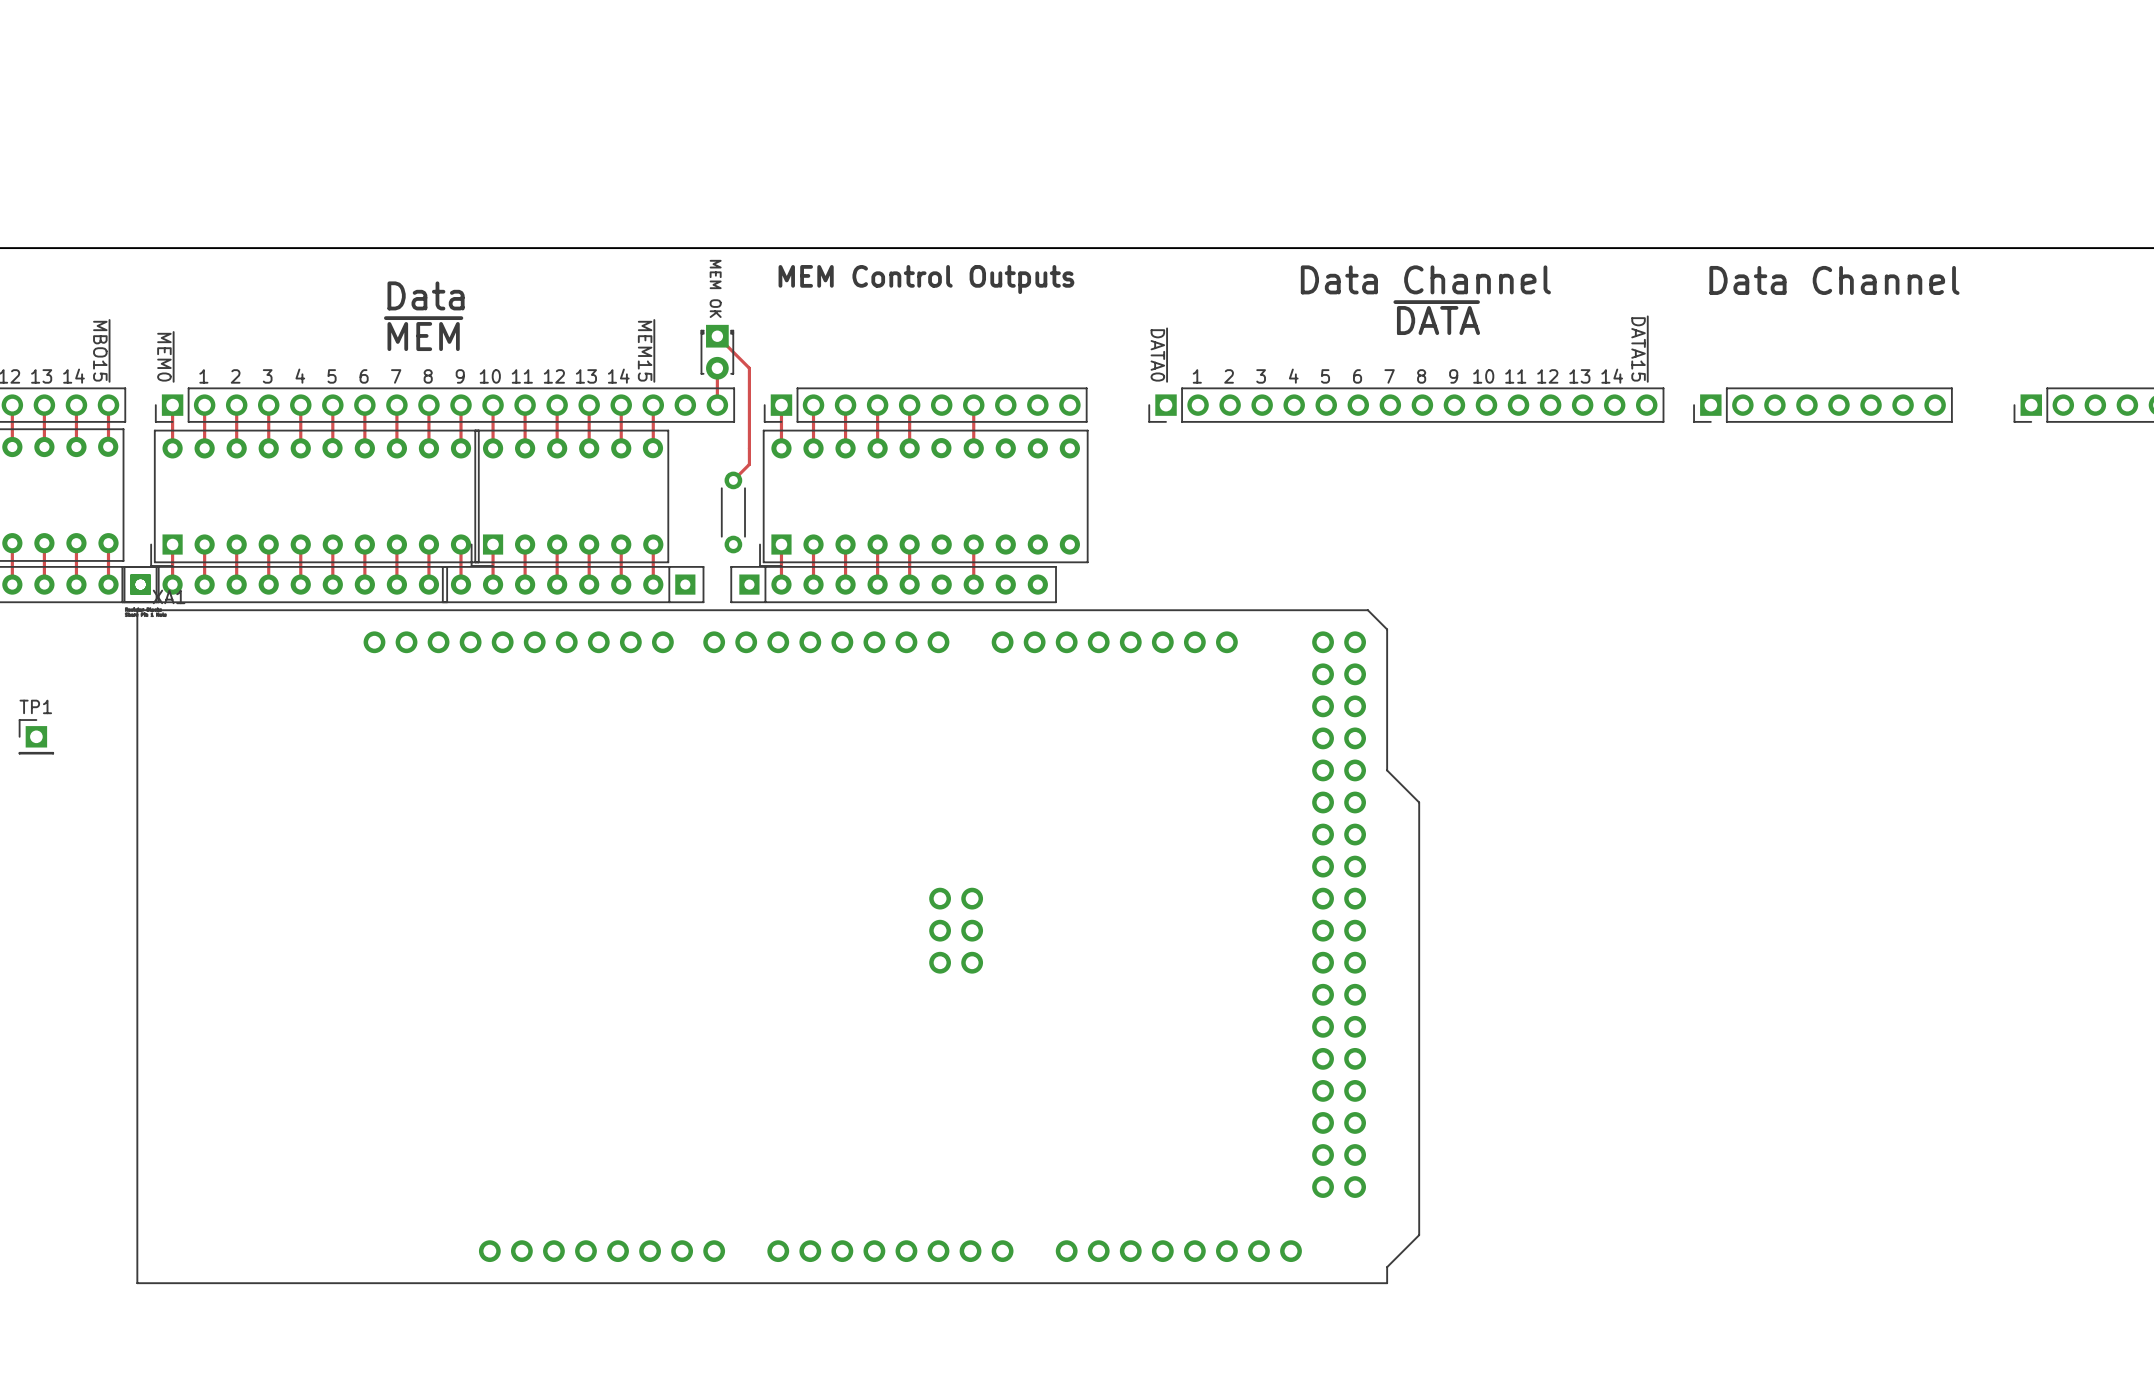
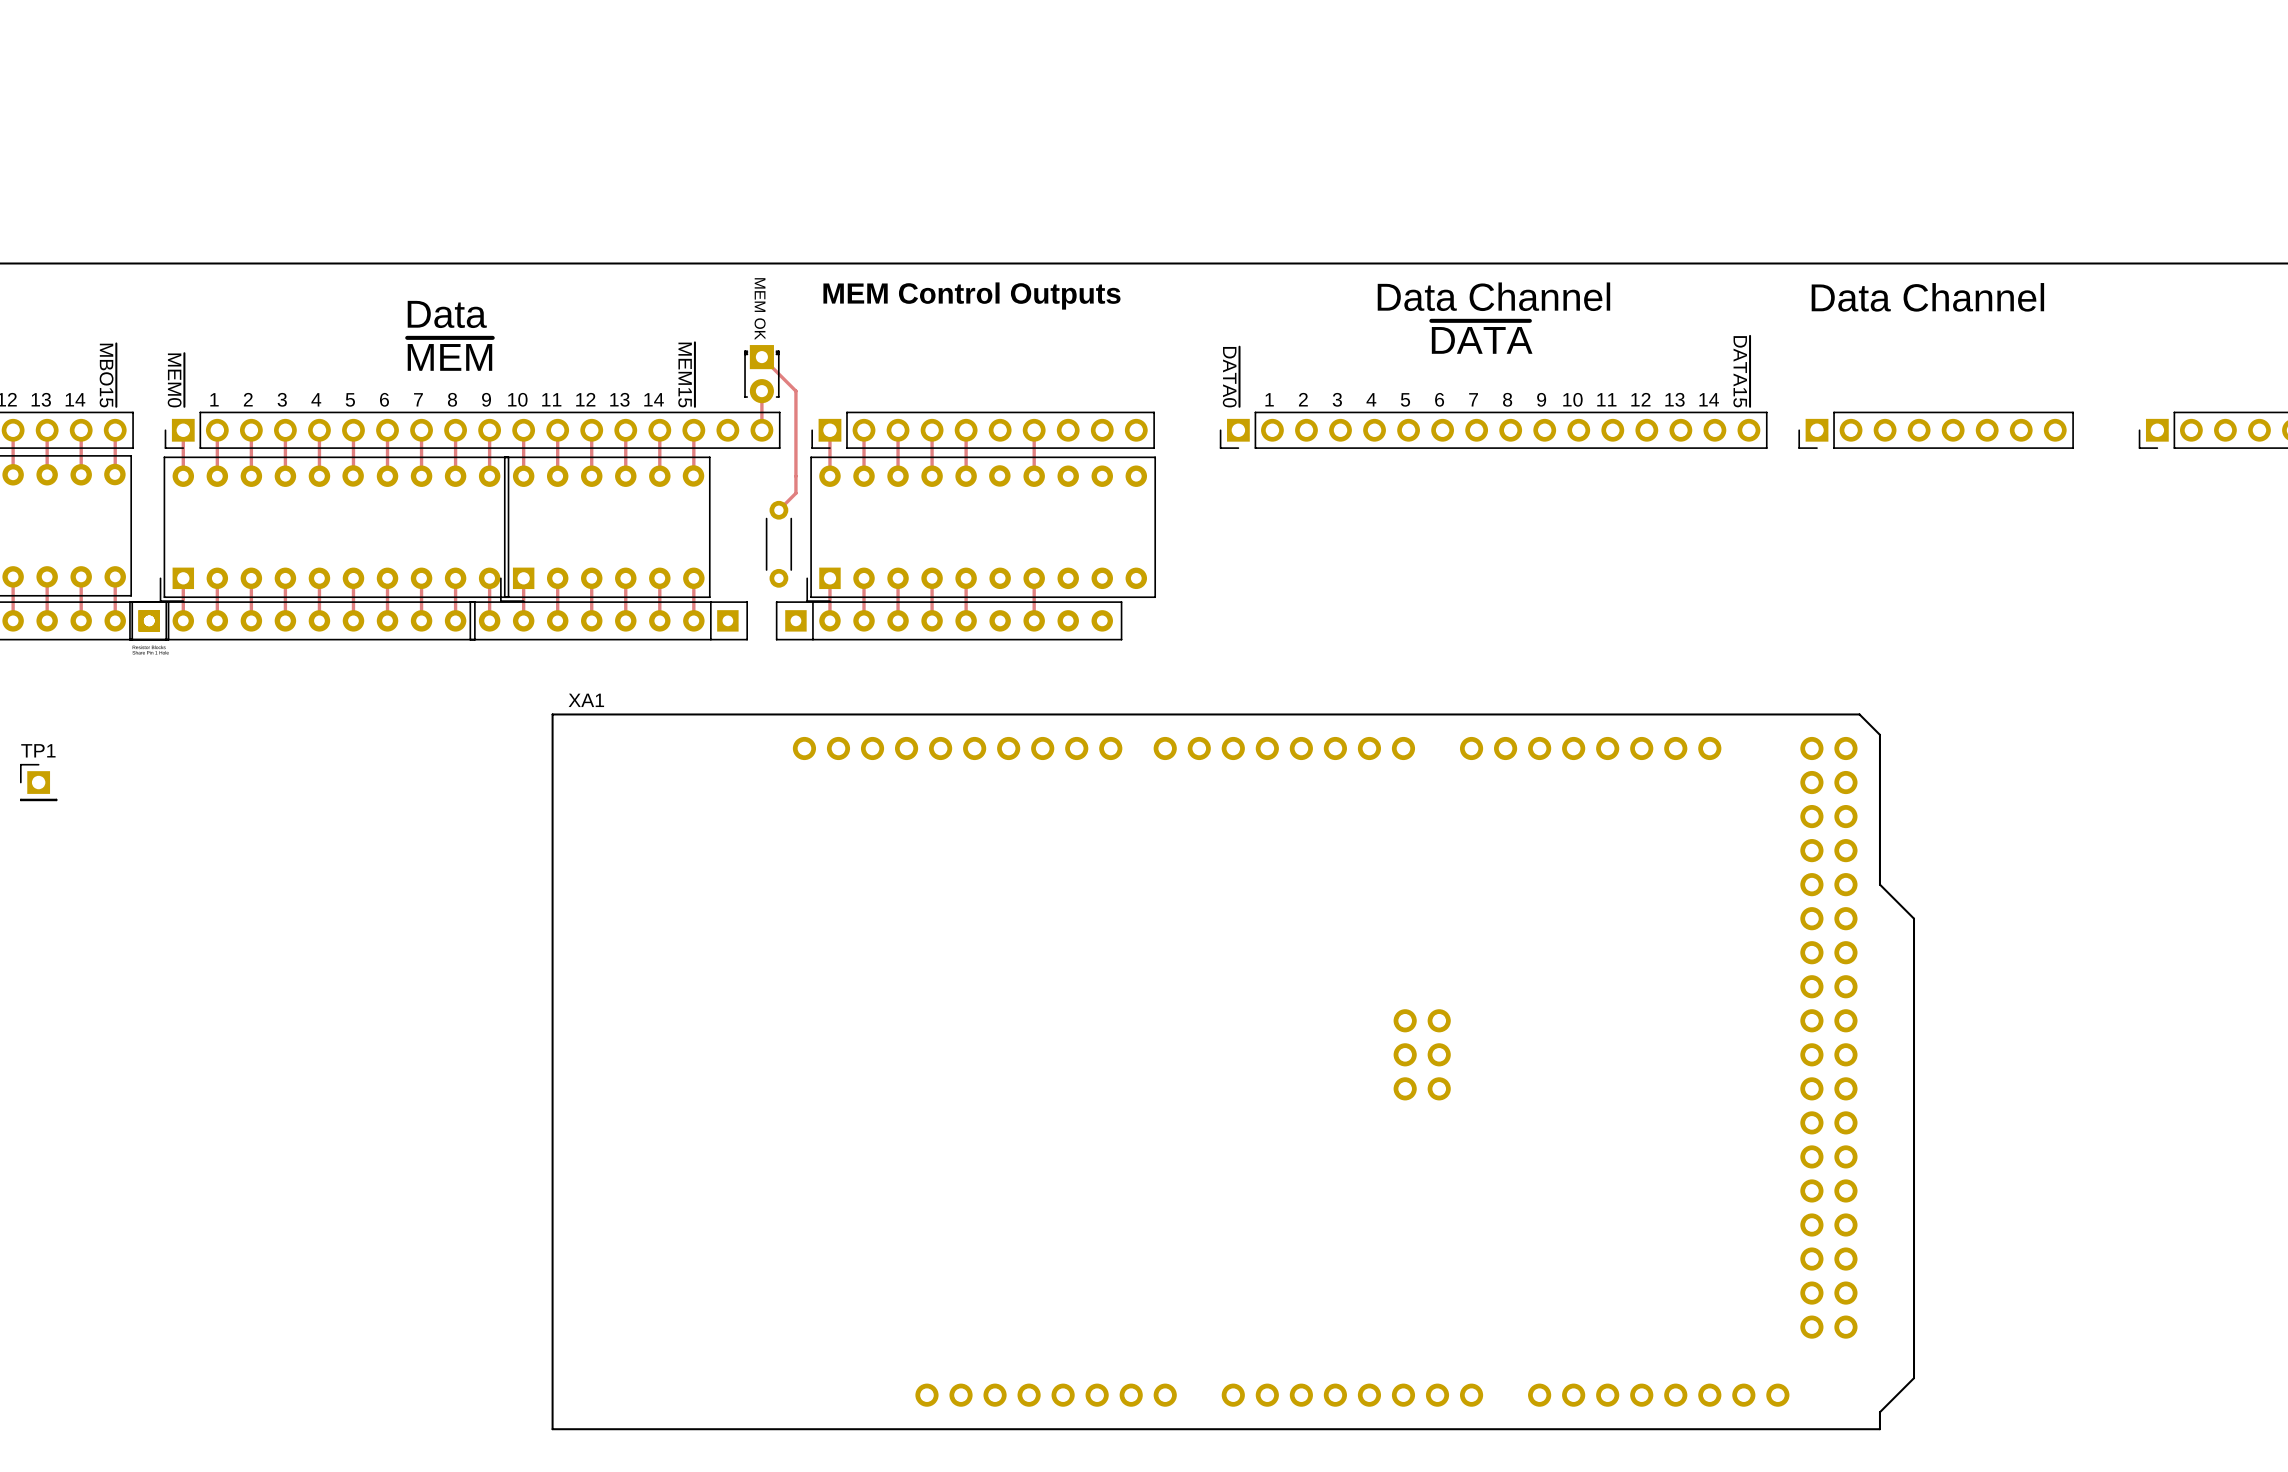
XA1 position: (778, 946) -> (1233, 1071)

